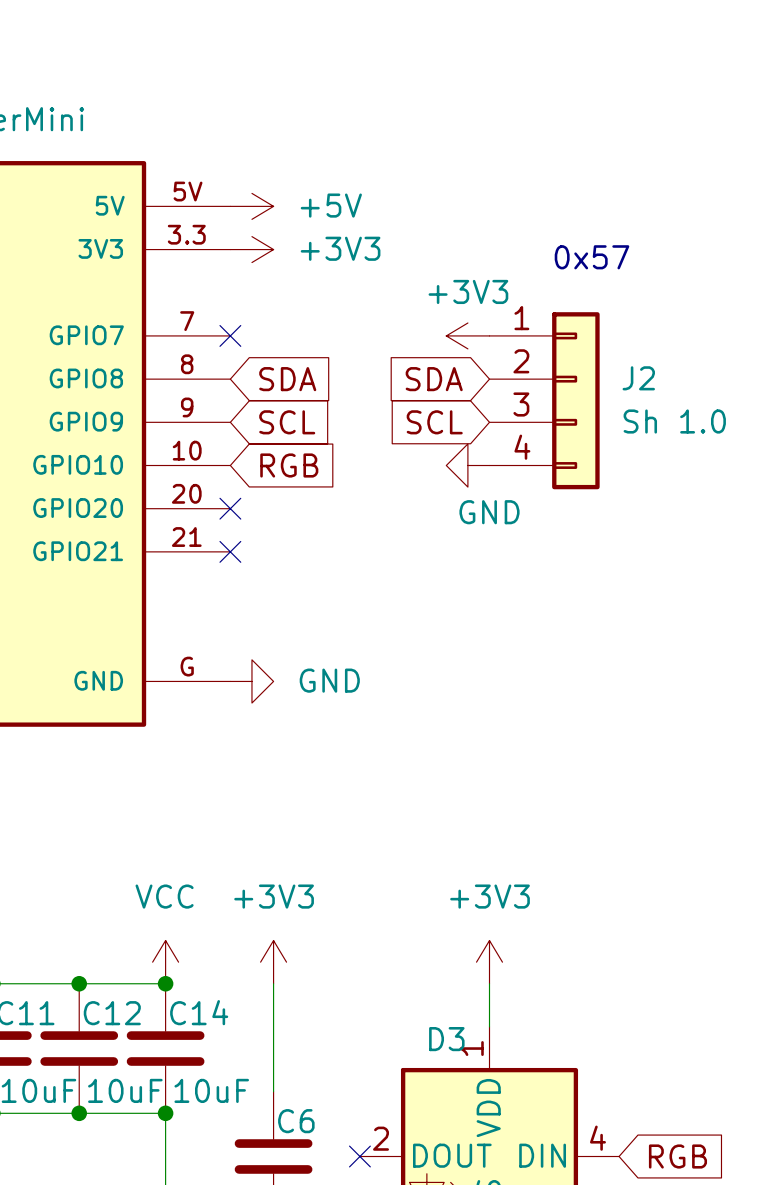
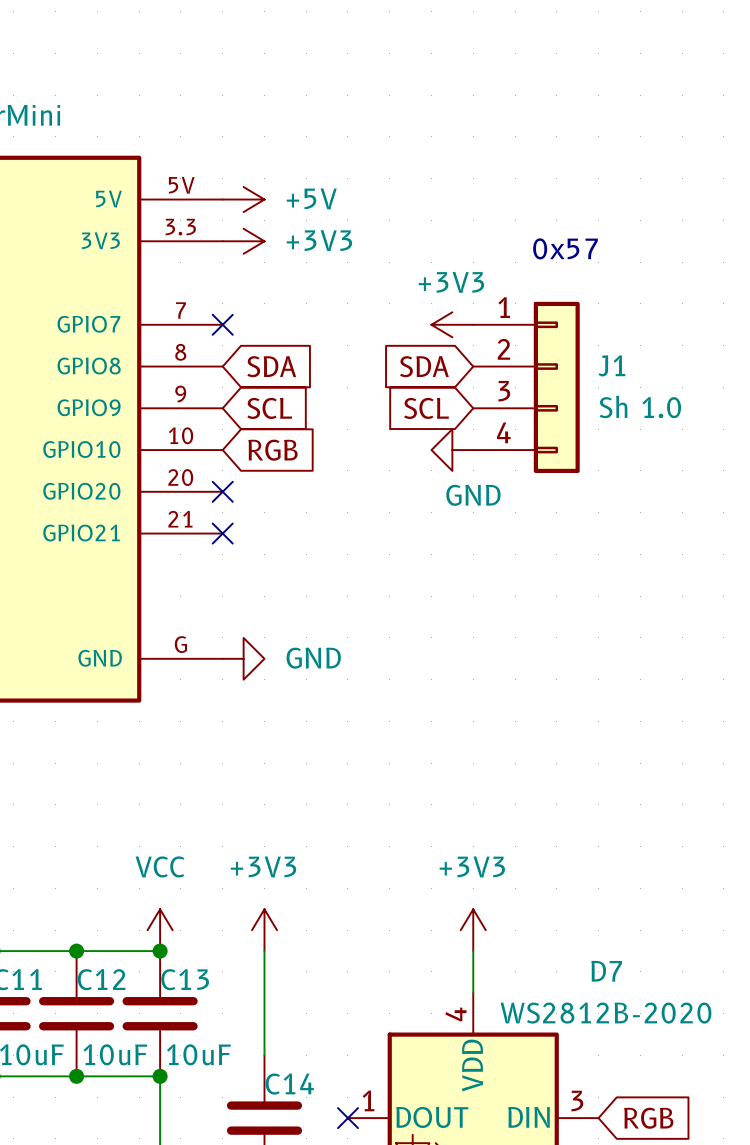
J2 name: J2 (638, 378) -> J1 (611, 365)
C14 name: C14 (199, 1012) -> C13 (185, 979)
D3 name: D3 (446, 1039) -> D7 (606, 971)
D3 value: none -> WS2812B-2020 (606, 1013)
D3 pin number: 1 (471, 1048) -> 4 (456, 1014)
C6 name: C6 (296, 1121) -> C14 (289, 1084)
D3 pin number: 2 (381, 1138) -> 1 (368, 1100)
D3 pin number: 4 (597, 1138) -> 3 (577, 1101)

